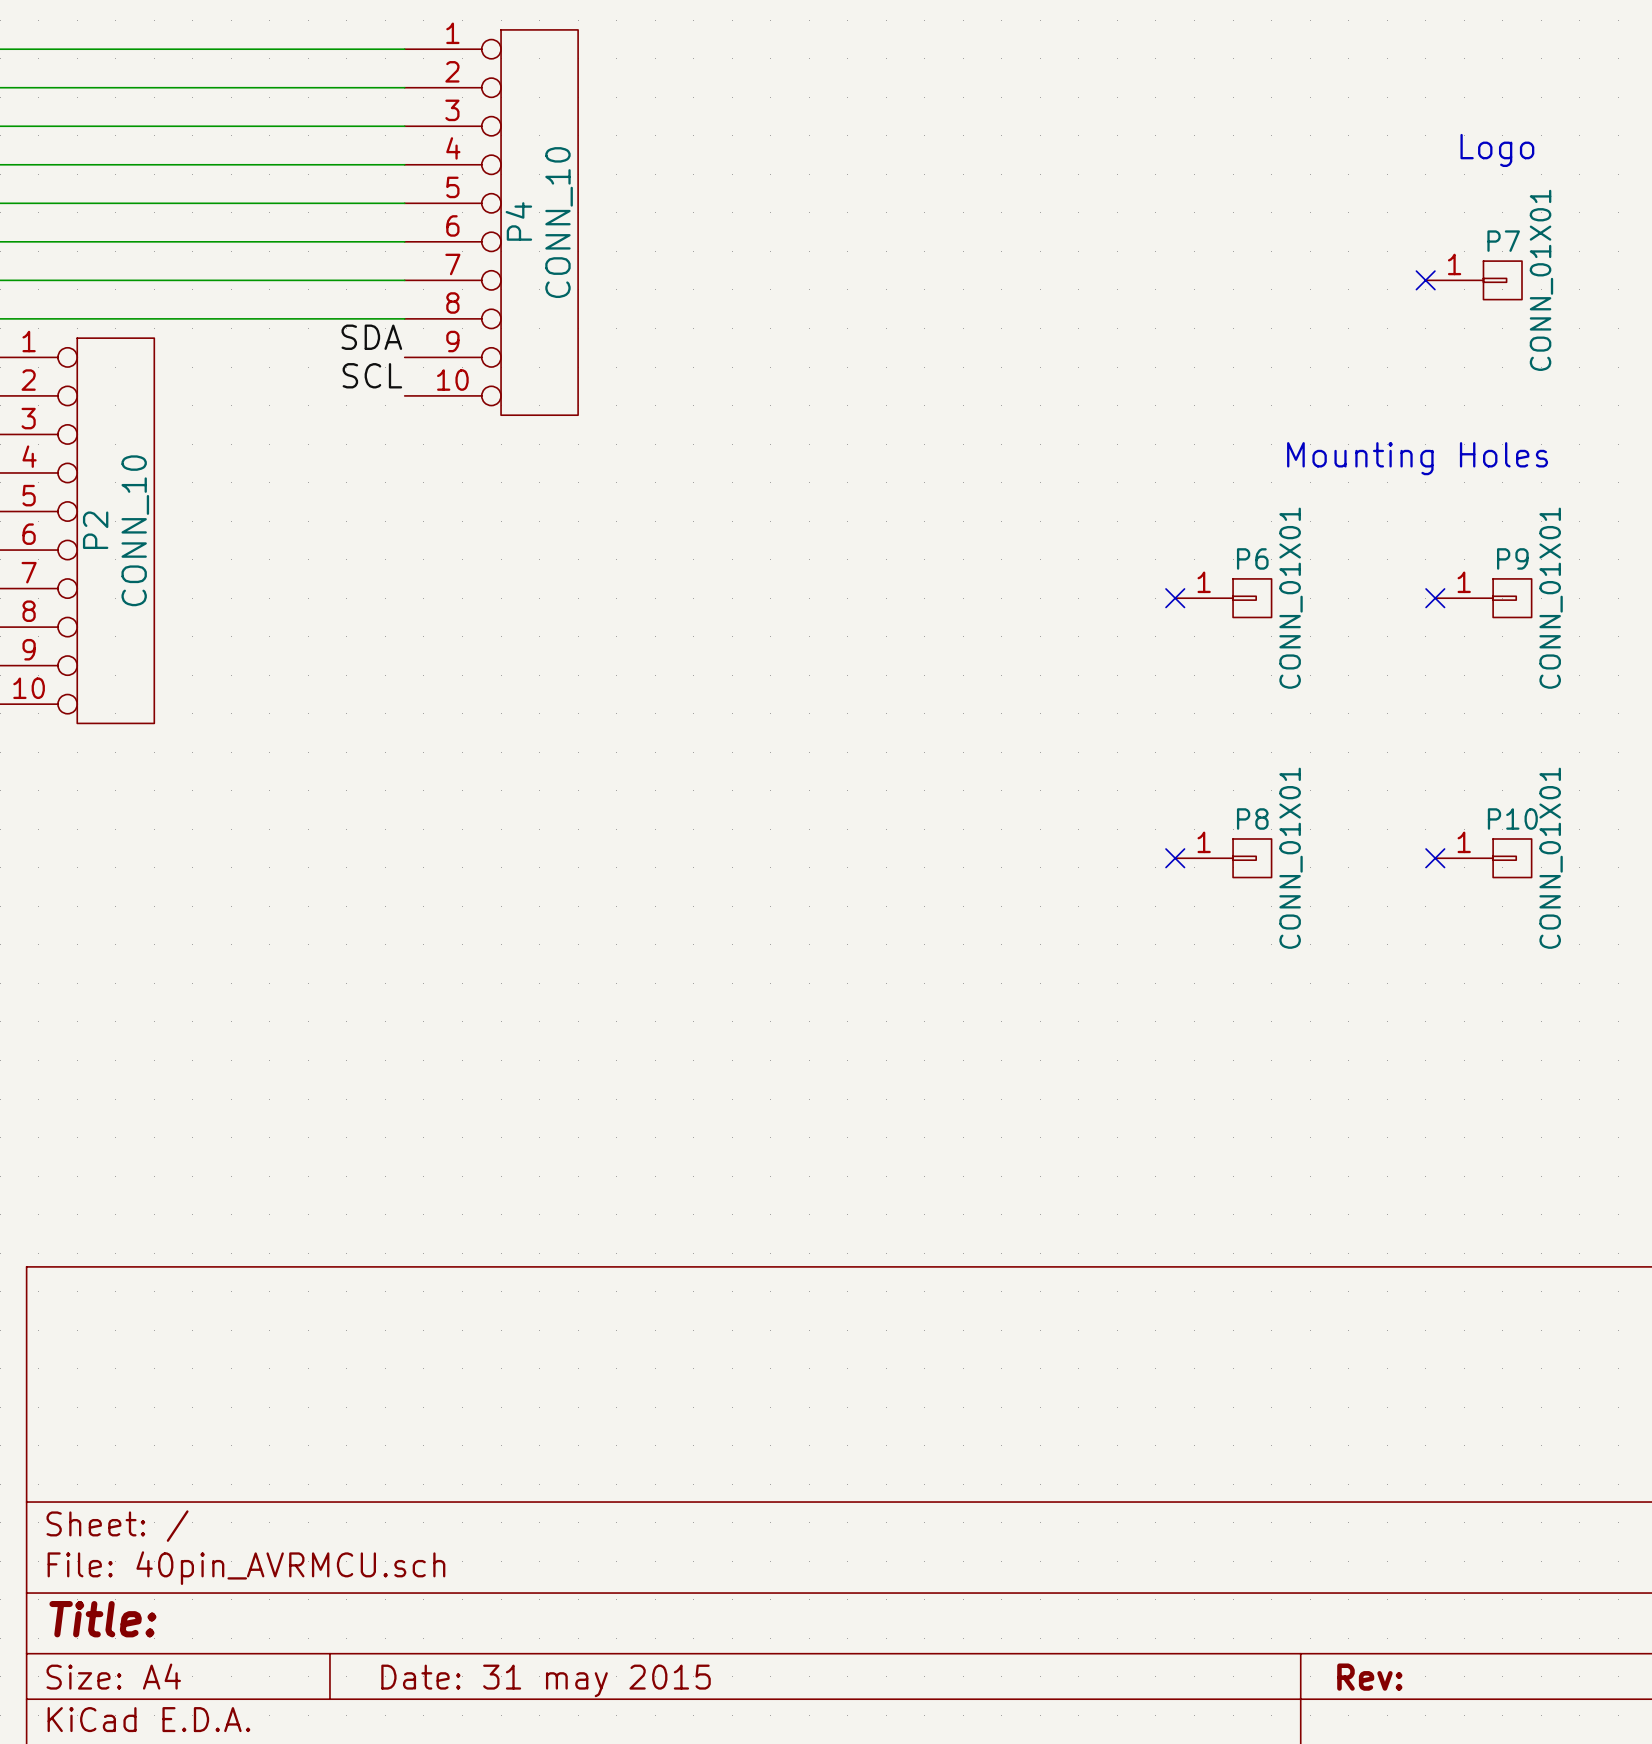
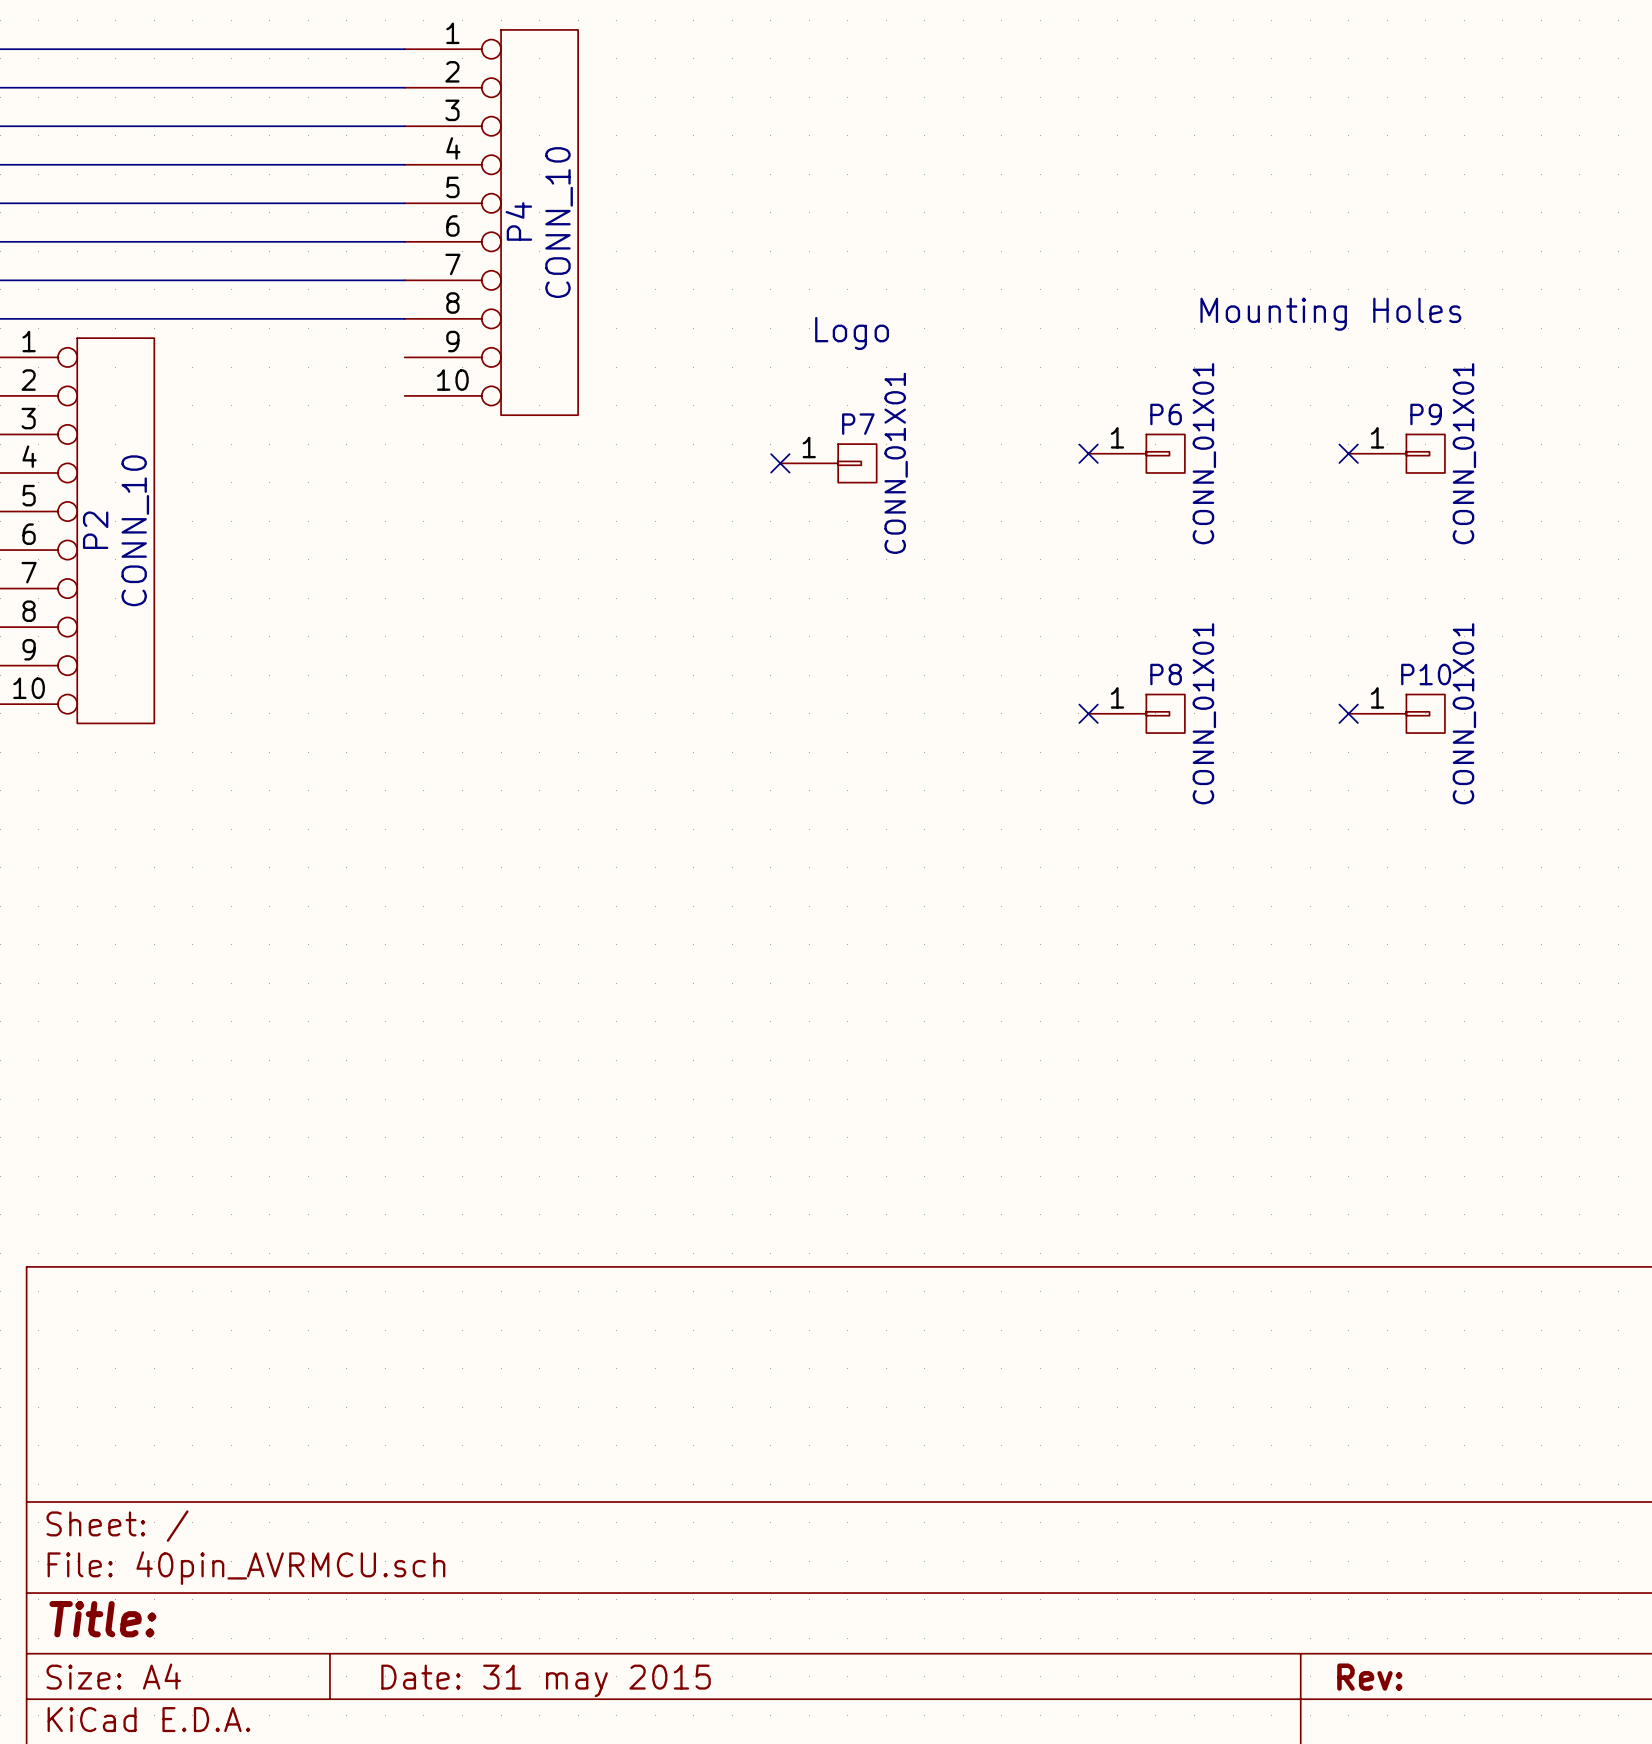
text: Logo (1497, 150) -> none
no-connect mark: (1425, 280) -> none
P7 position: (1473, 280) -> (828, 463)
text: none -> Logo (852, 333)
label: SDA (371, 337) -> none
label: SCL (372, 375) -> none
no-connect mark: none -> (1088, 453)
no-connect mark: none -> (1348, 453)
text position: Mounting Holes (1417, 458) -> Mounting Holes (1330, 314)
no-connect mark: none -> (780, 463)
no-connect mark: (1175, 598) -> none
P6 position: (1223, 598) -> (1136, 453)
no-connect mark: (1435, 598) -> none
P9 position: (1483, 598) -> (1396, 453)
no-connect mark: none -> (1088, 713)
no-connect mark: none -> (1348, 713)
no-connect mark: (1175, 858) -> none
P8 position: (1223, 858) -> (1136, 713)
no-connect mark: (1435, 858) -> none
P10 position: (1483, 858) -> (1396, 713)

